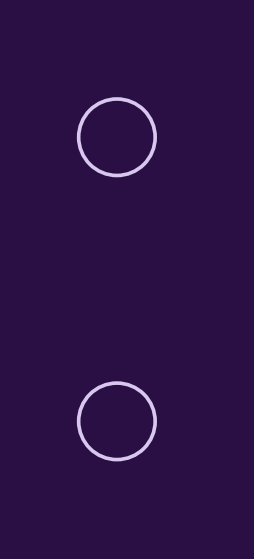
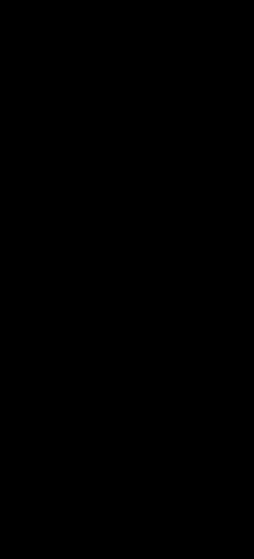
round board edge: [76, 97, 157, 178] -> none
round board edge: [76, 381, 157, 462] -> none

